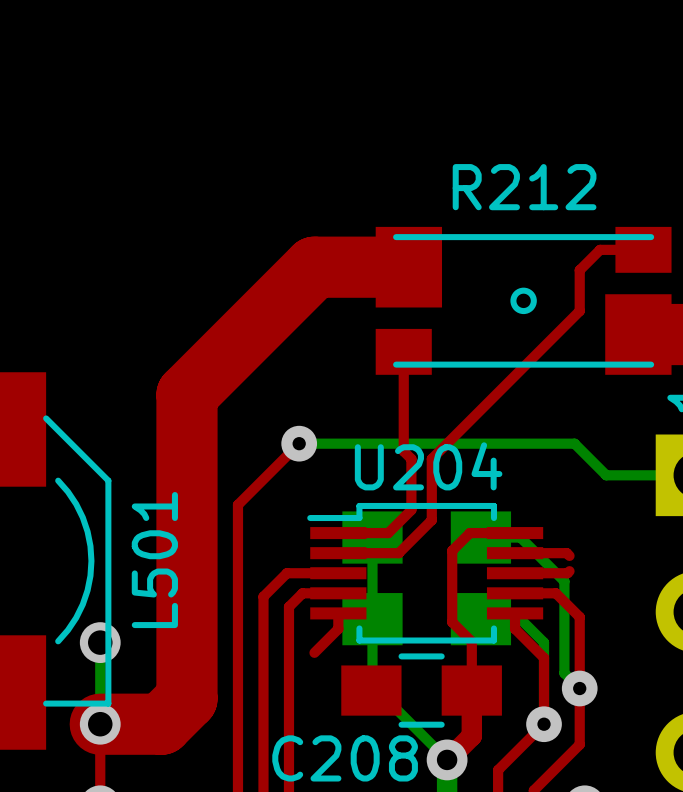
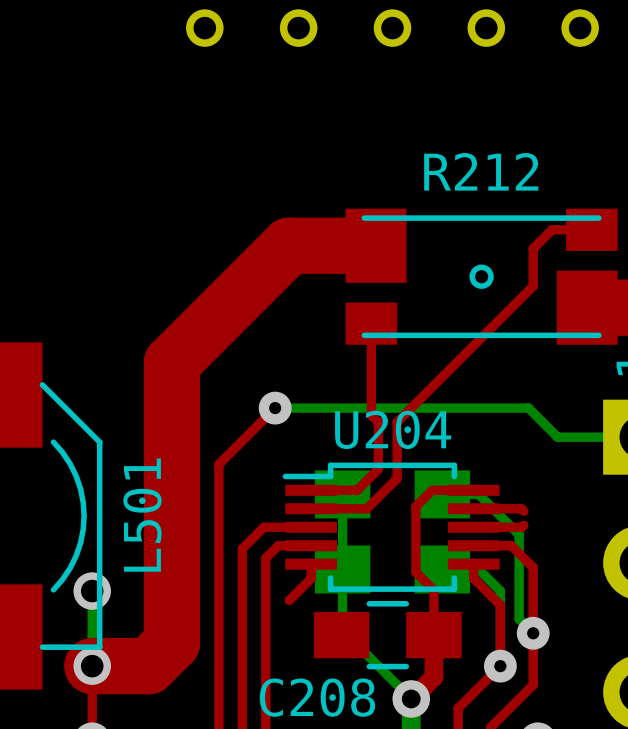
part: none -> (204, 28)
part: none -> (298, 28)
part: none -> (392, 28)
part: none -> (486, 28)
part: none -> (580, 28)

